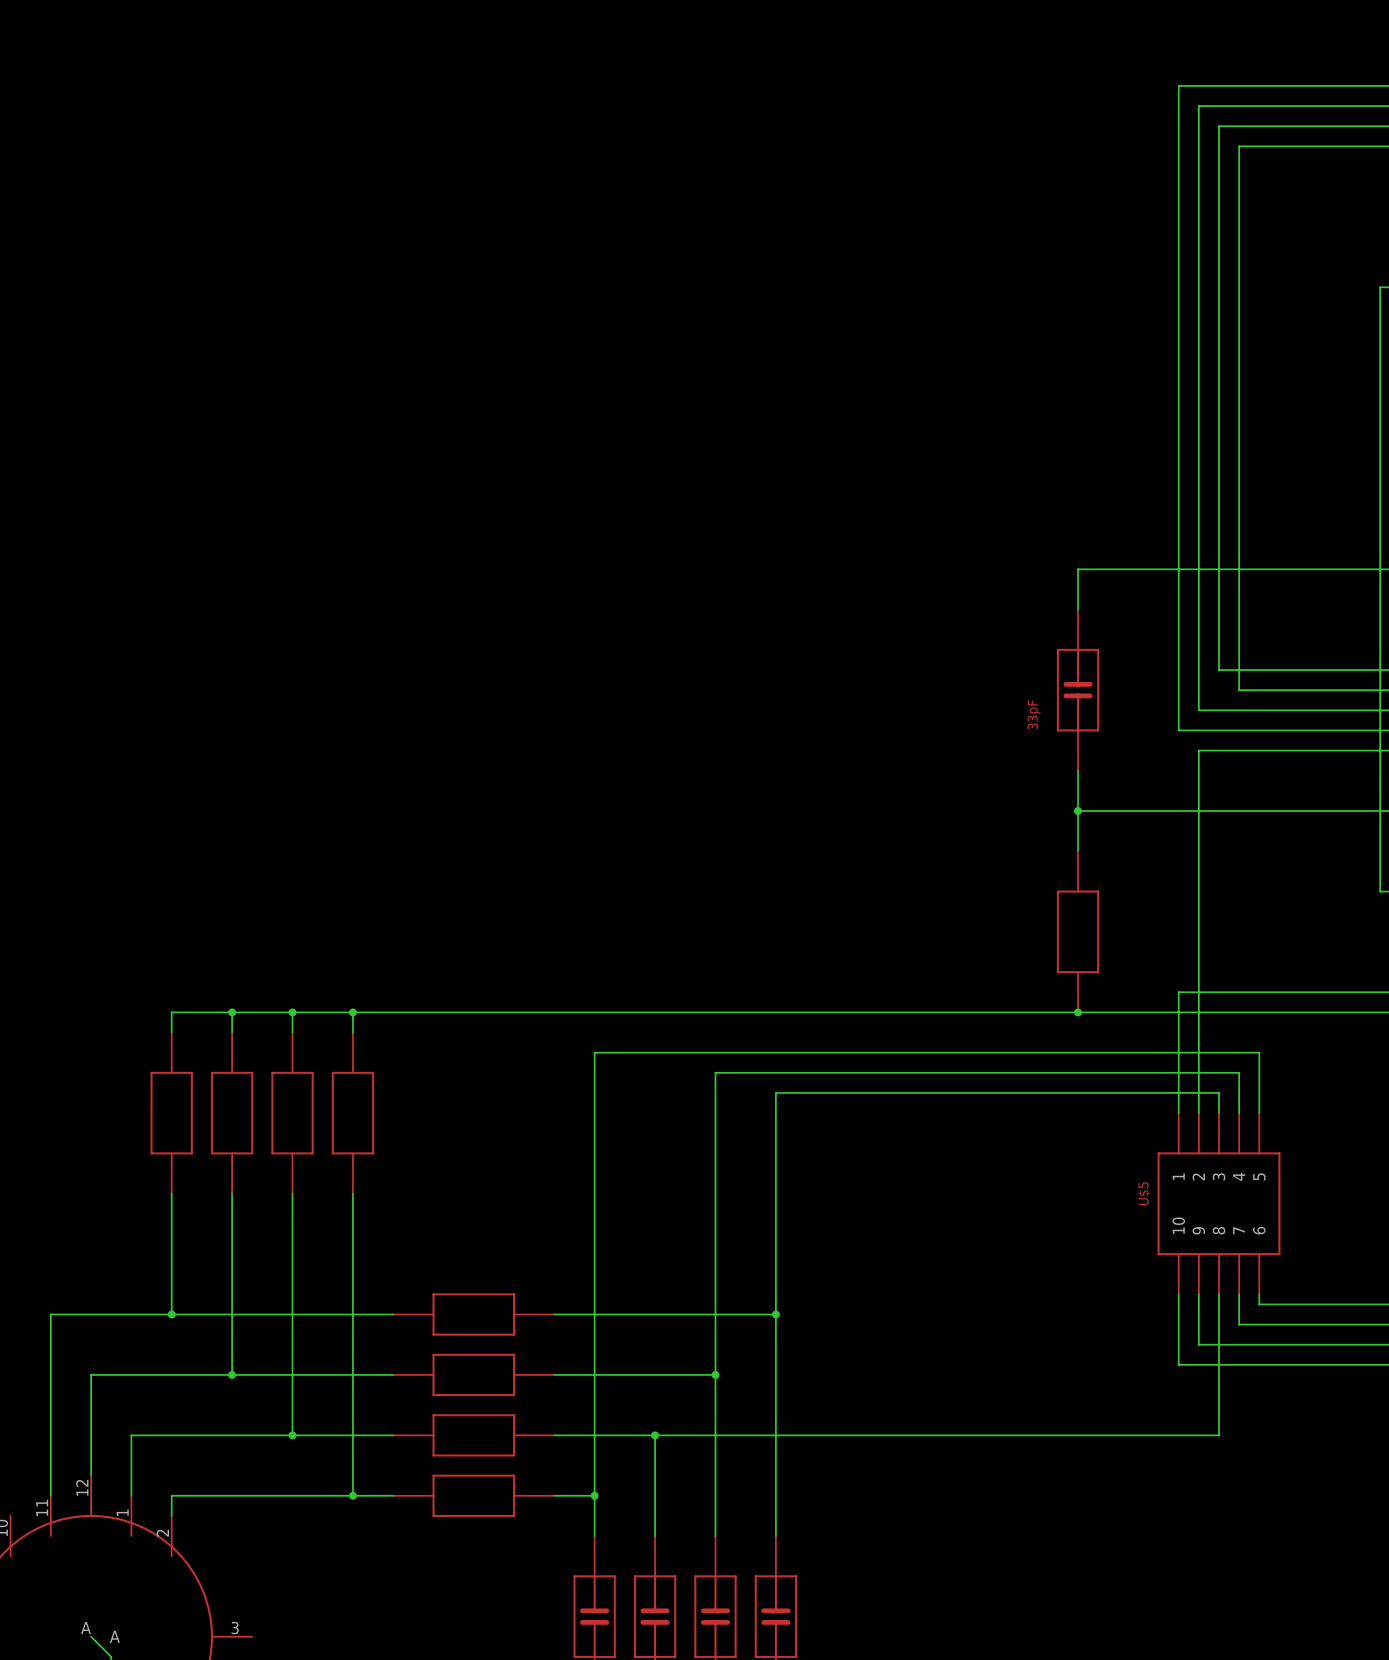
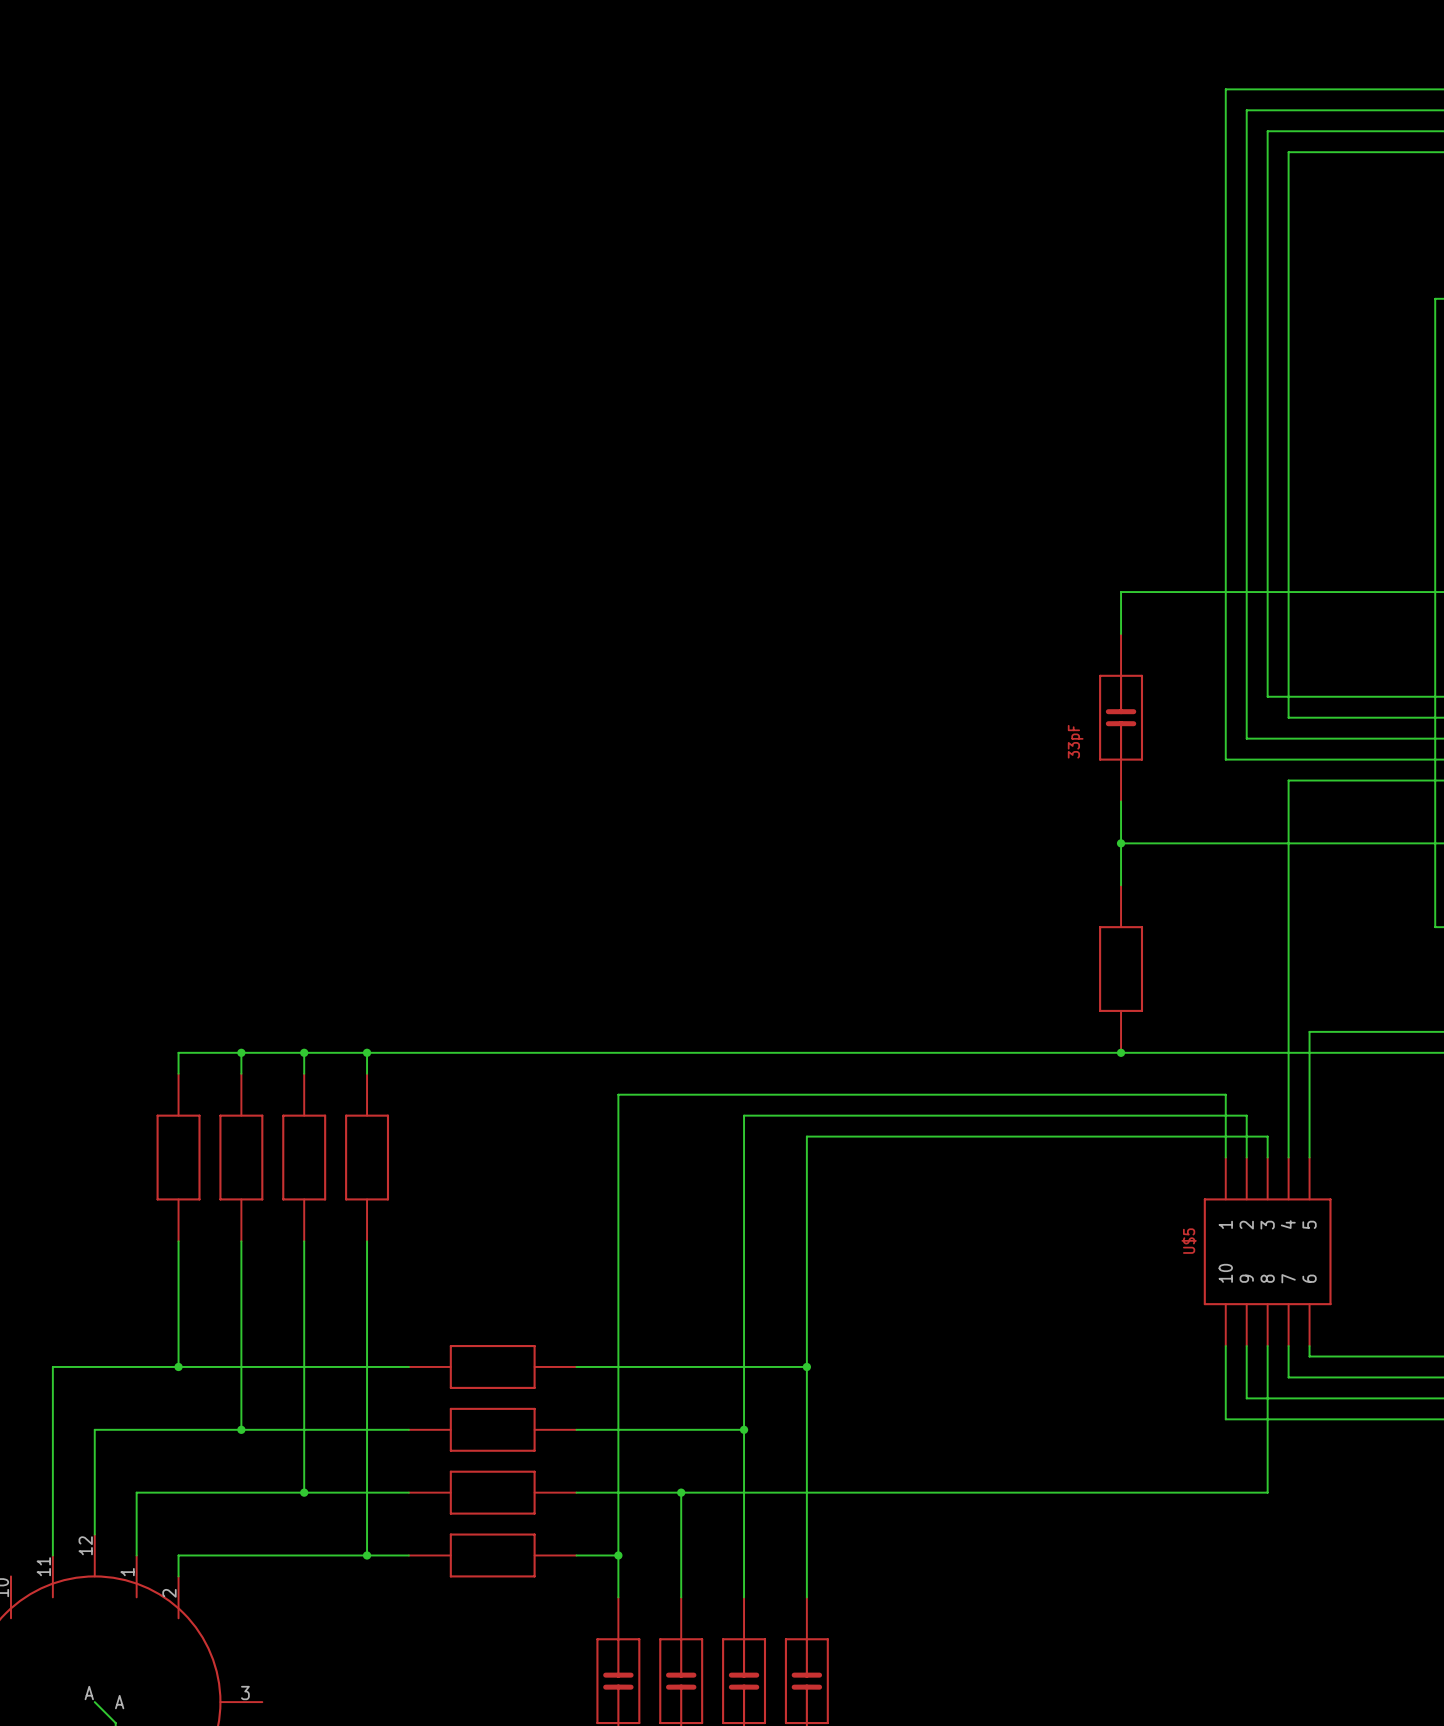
wire: (1239, 750) (1198, 750) (1198, 1072) (1239, 1072) -> (1288, 780) (1288, 1115)
wire: (1259, 992) (1178, 992) (1178, 1052) (1259, 1052) -> (1309, 1031) (1309, 1094)

